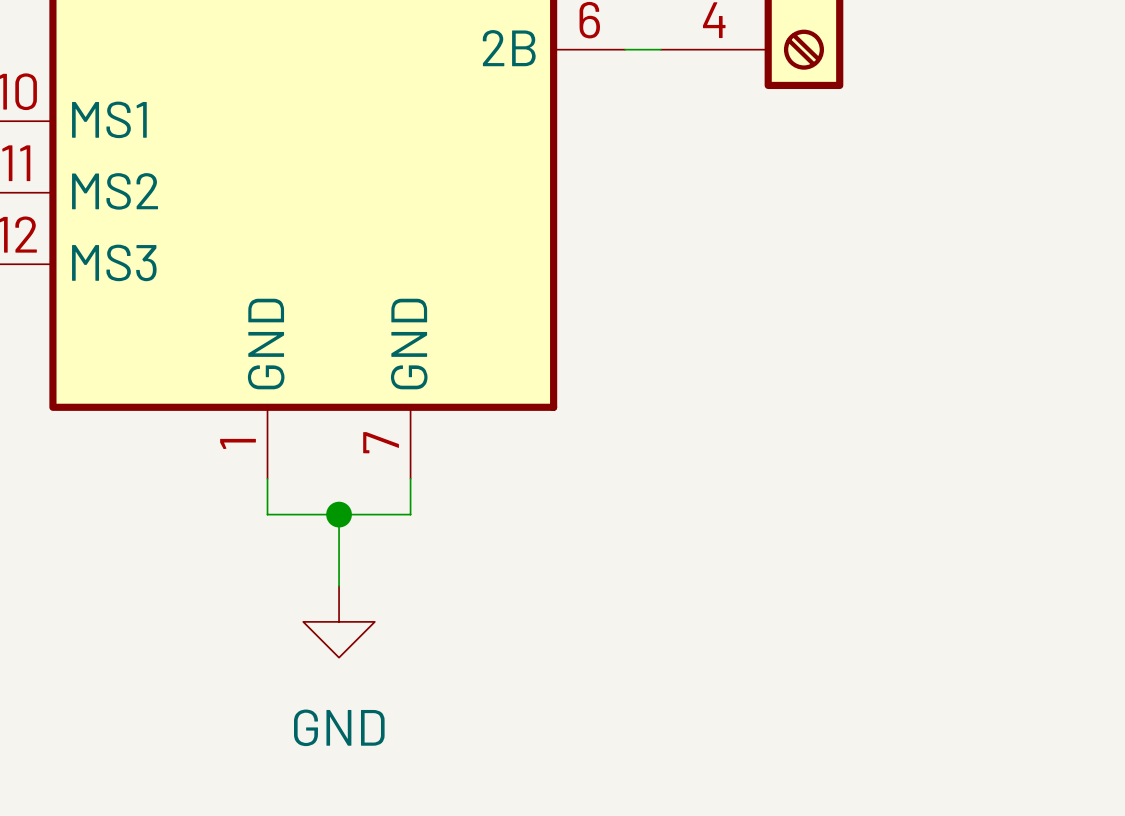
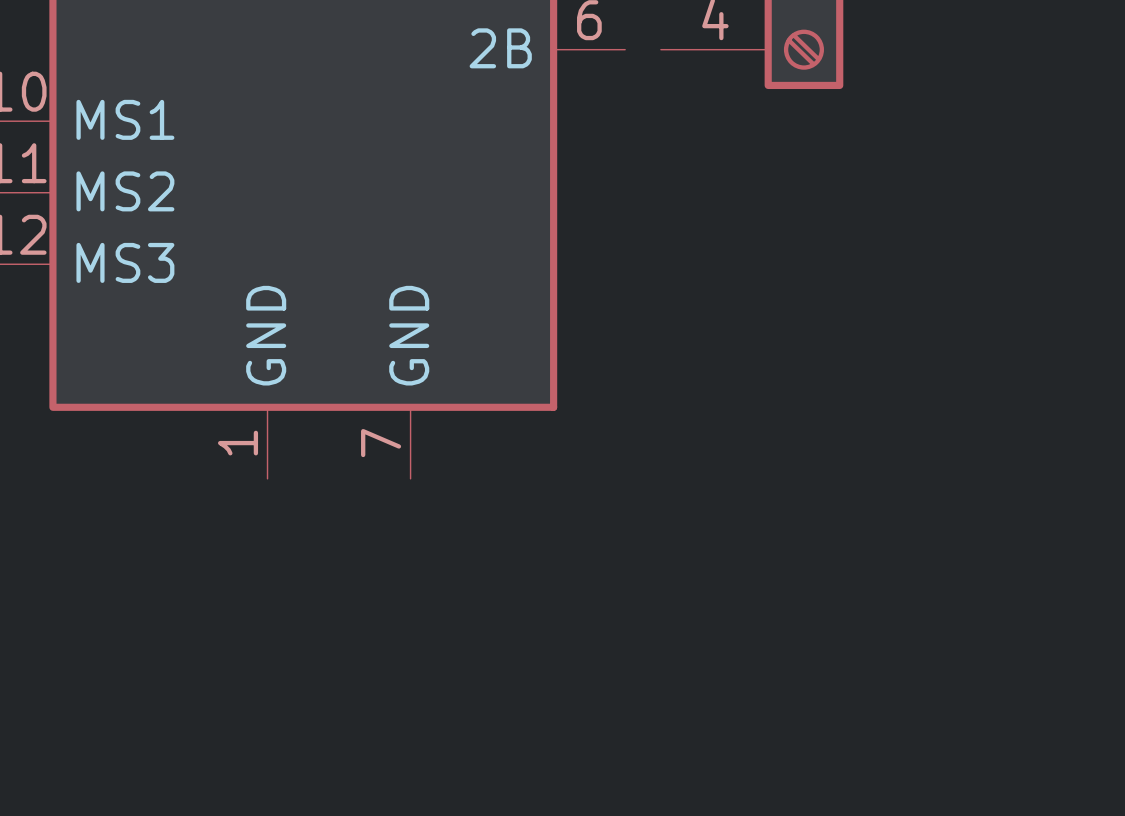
wire: (625, 49) (660, 49) -> none
wire: (267, 478) (267, 514) (410, 514) (410, 478) -> none
wire: (339, 514) (339, 586) -> none
junction: (339, 514) -> none
power symbol: GND (339, 621) -> none

